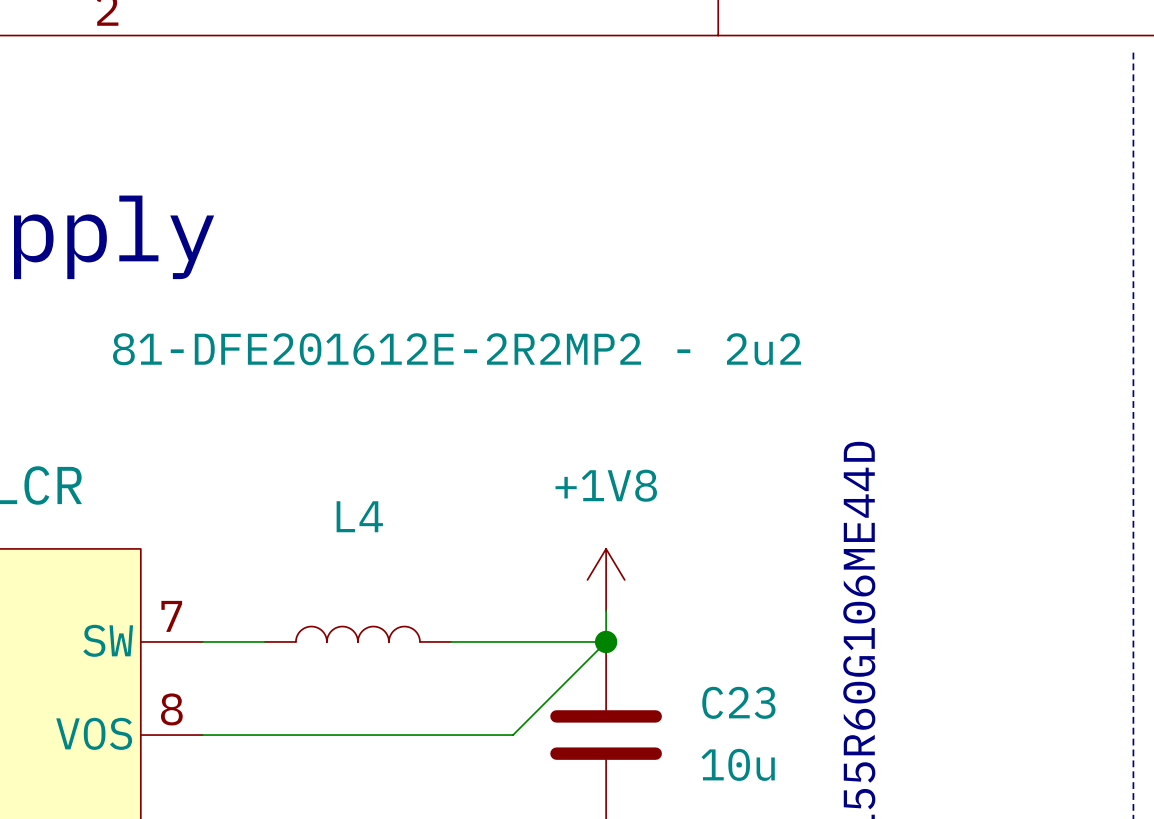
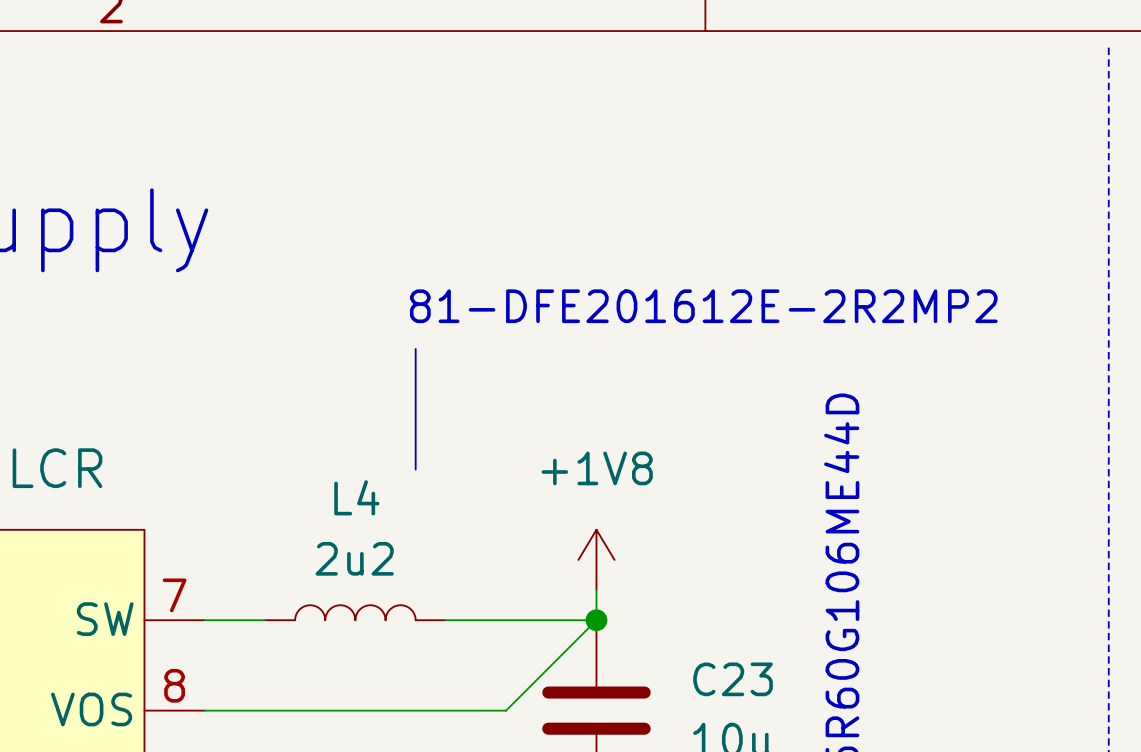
text: none -> 81-DFE201612E-2R2MP2 (703, 306)
L4 value: 81-DFE201612E-2R2MP2 - 2u2 (457, 349) -> 2u2 (354, 558)
line: none -> (415, 349) (415, 469)

